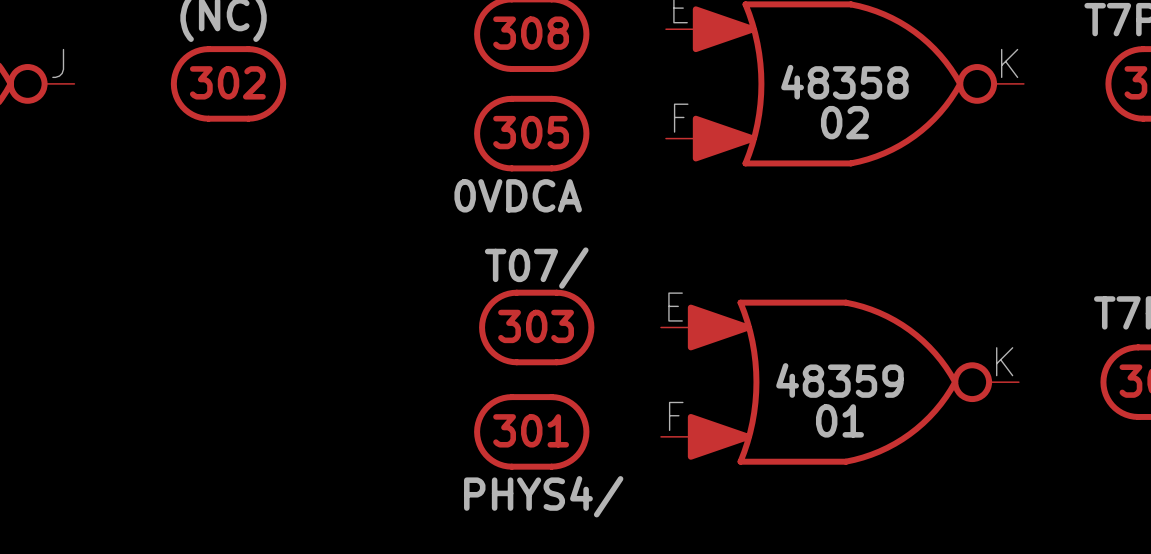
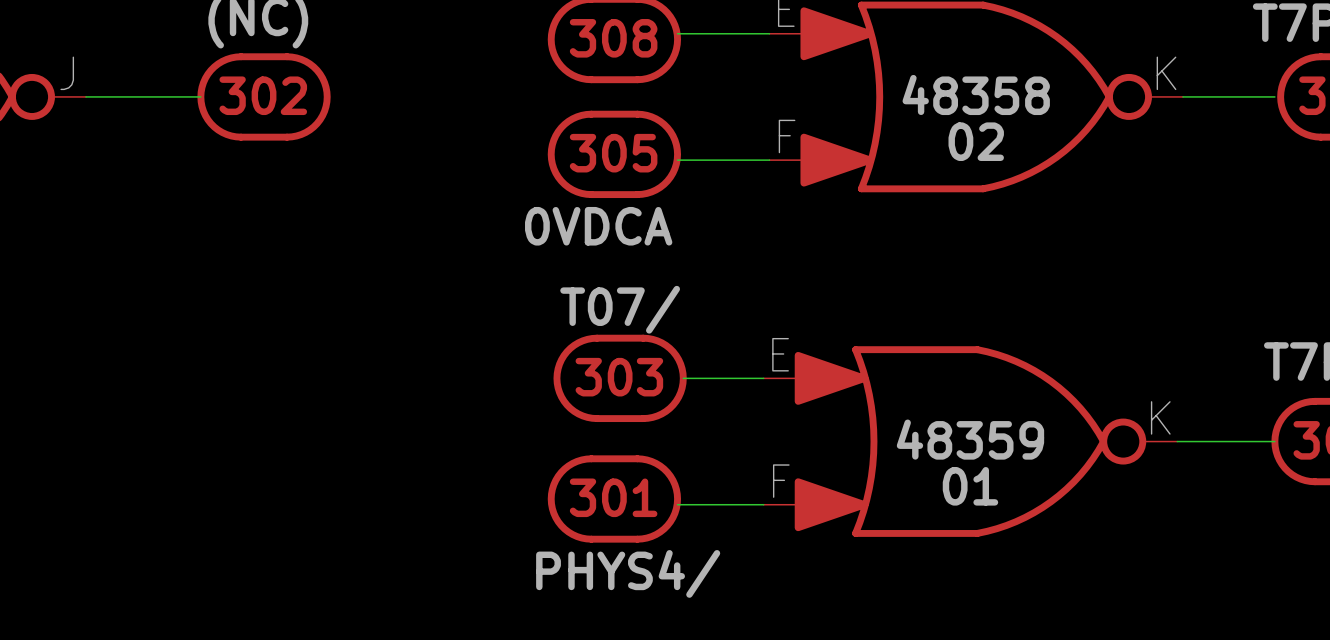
wire: none -> (677, 33) (769, 33)
wire: none -> (85, 96) (200, 96)
wire: none -> (1182, 96) (1274, 96)
wire: none -> (677, 160) (769, 160)
wire: none -> (683, 378) (763, 378)
wire: none -> (1177, 441) (1274, 441)
wire: none -> (677, 504) (763, 504)

